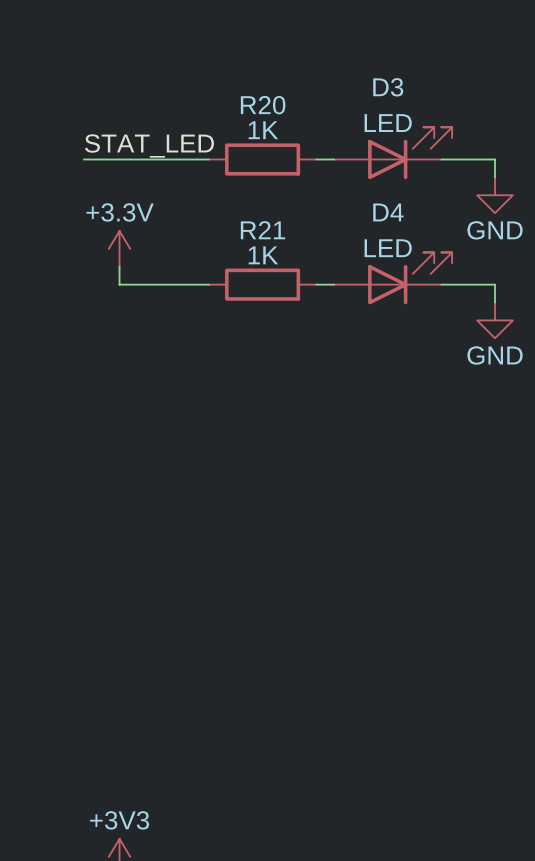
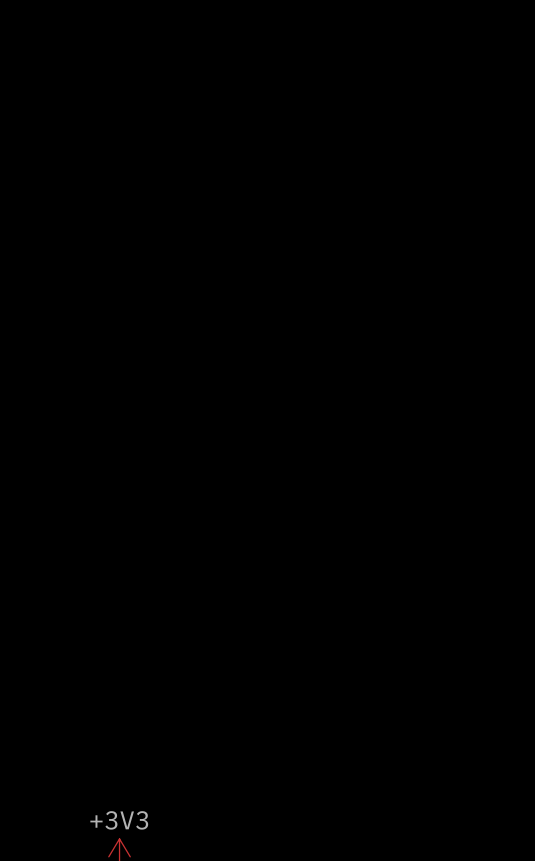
label: STAT_LED (149, 145) -> none
D3: LED (393, 153) -> none
wire: (83, 159) (208, 159) -> none
R20: 1K (262, 159) -> none
wire: (316, 159) (334, 159) -> none
wire: (441, 159) (495, 159) (495, 177) -> none
power symbol: GND (495, 195) -> none
power symbol: +3.3V (119, 248) -> none
wire: (119, 266) (119, 284) (208, 284) -> none
D4: LED (393, 278) -> none
R21: 1K (262, 284) -> none
wire: (316, 284) (334, 284) -> none
wire: (441, 284) (495, 284) (495, 302) -> none
power symbol: GND (495, 320) -> none

